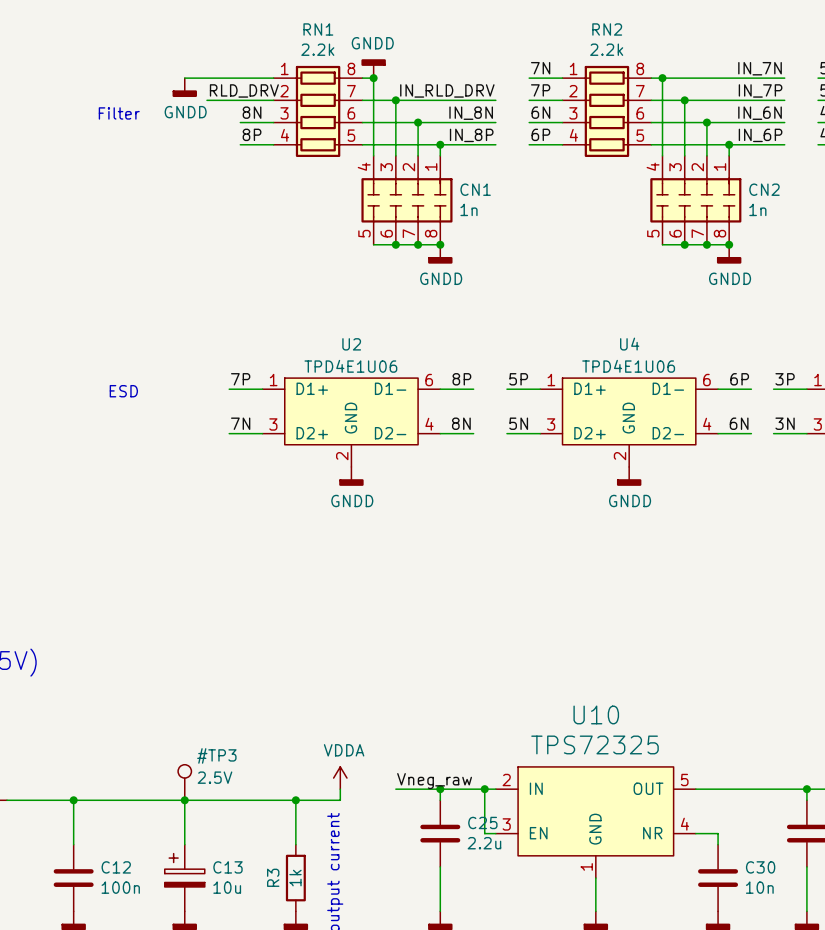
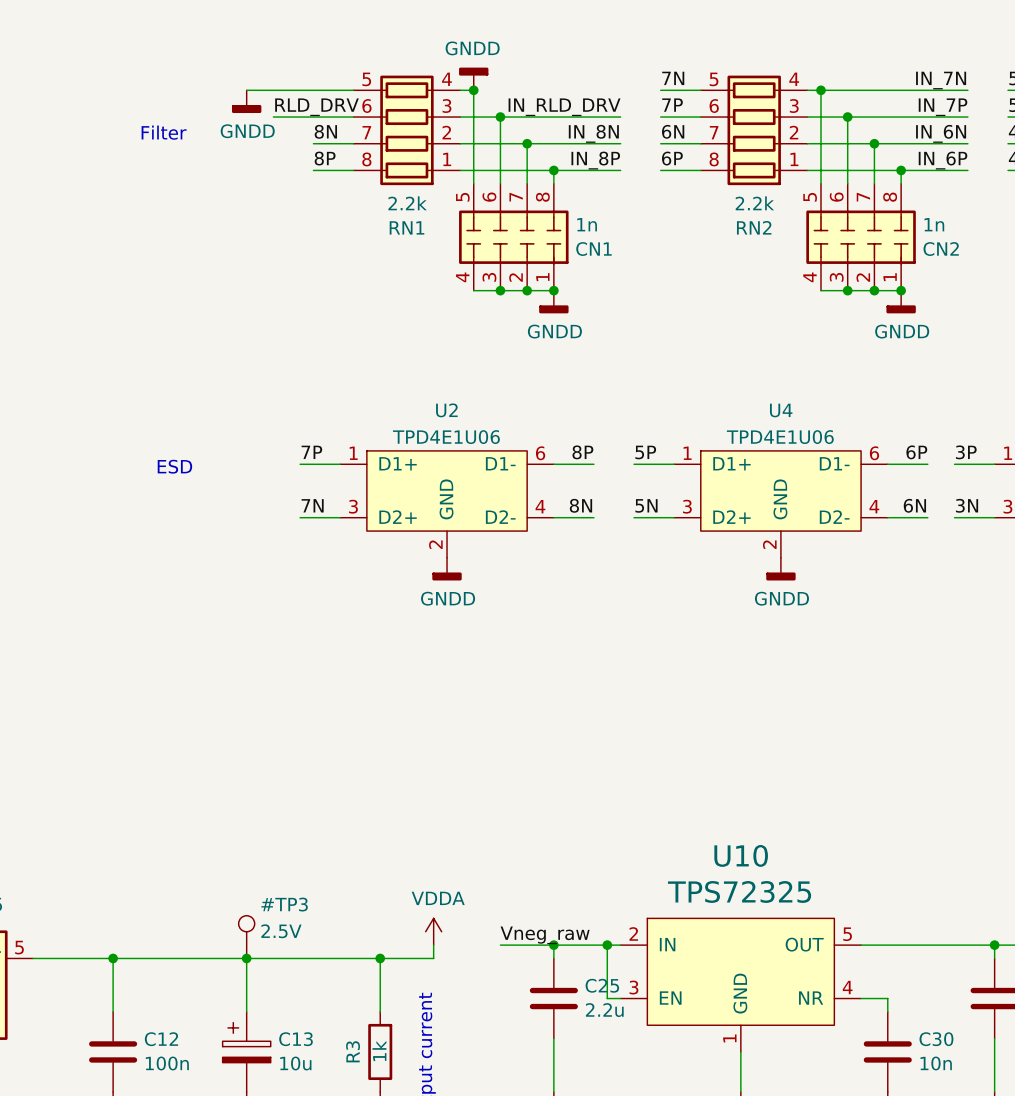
RN1 rotation: 0° (318, 111) -> 180° (406, 130)
RN2 rotation: 0° (606, 111) -> 180° (754, 130)
CN1 flip: as is (406, 200) -> up-down (513, 237)
CN2 flip: as is (695, 200) -> up-down (861, 237)

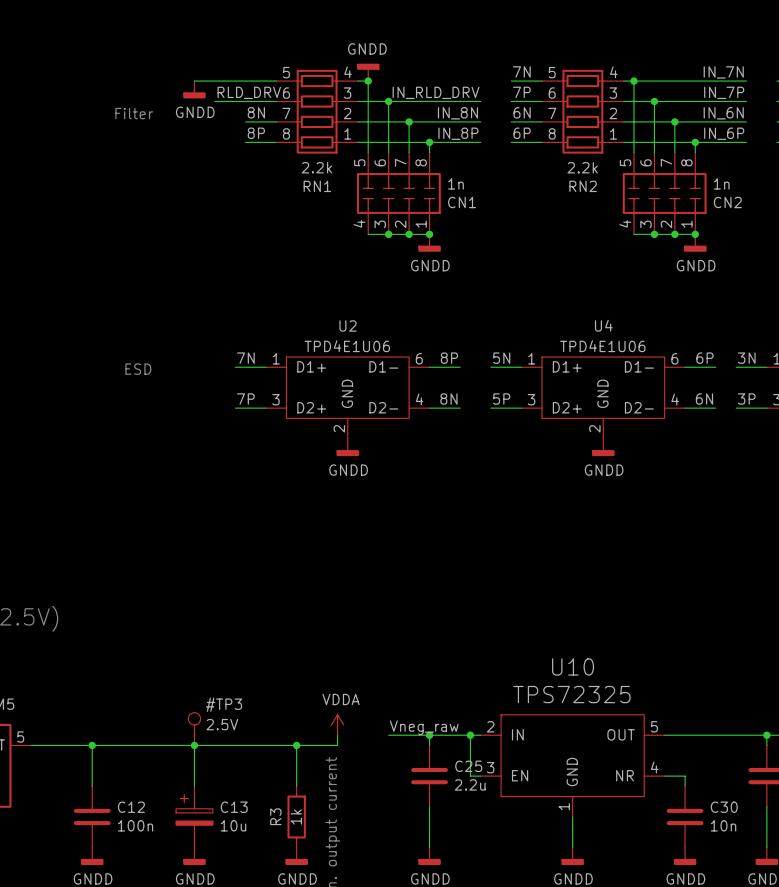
label: 7P (311, 452) -> 7N (245, 358)
label: 5P (645, 452) -> 5N (501, 358)
label: 3P (966, 452) -> 3N (746, 358)
label: 7N (312, 505) -> 7P (245, 399)
label: 5N (646, 505) -> 5P (501, 399)
label: 3N (967, 505) -> 3P (746, 399)

